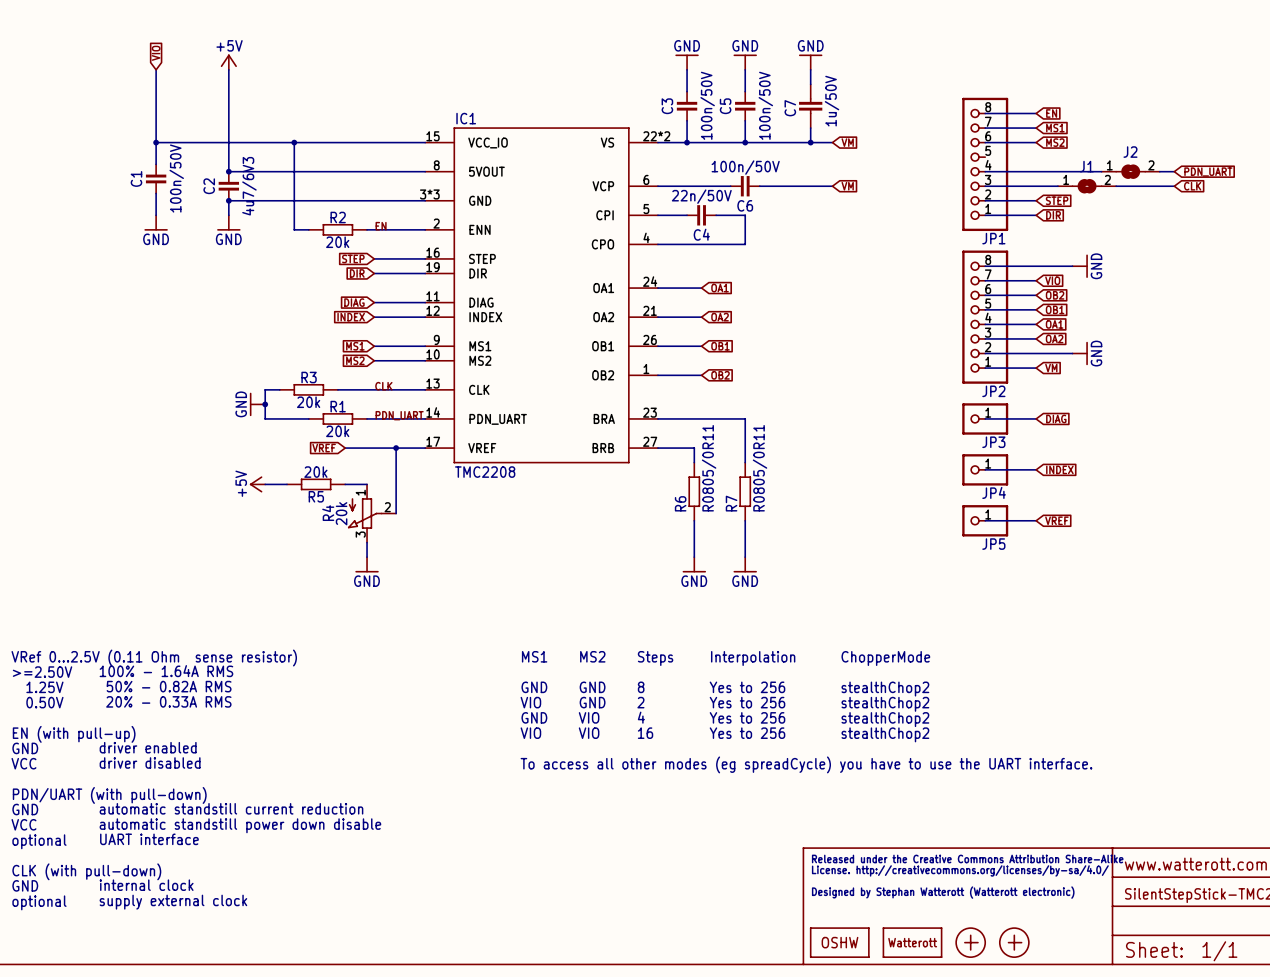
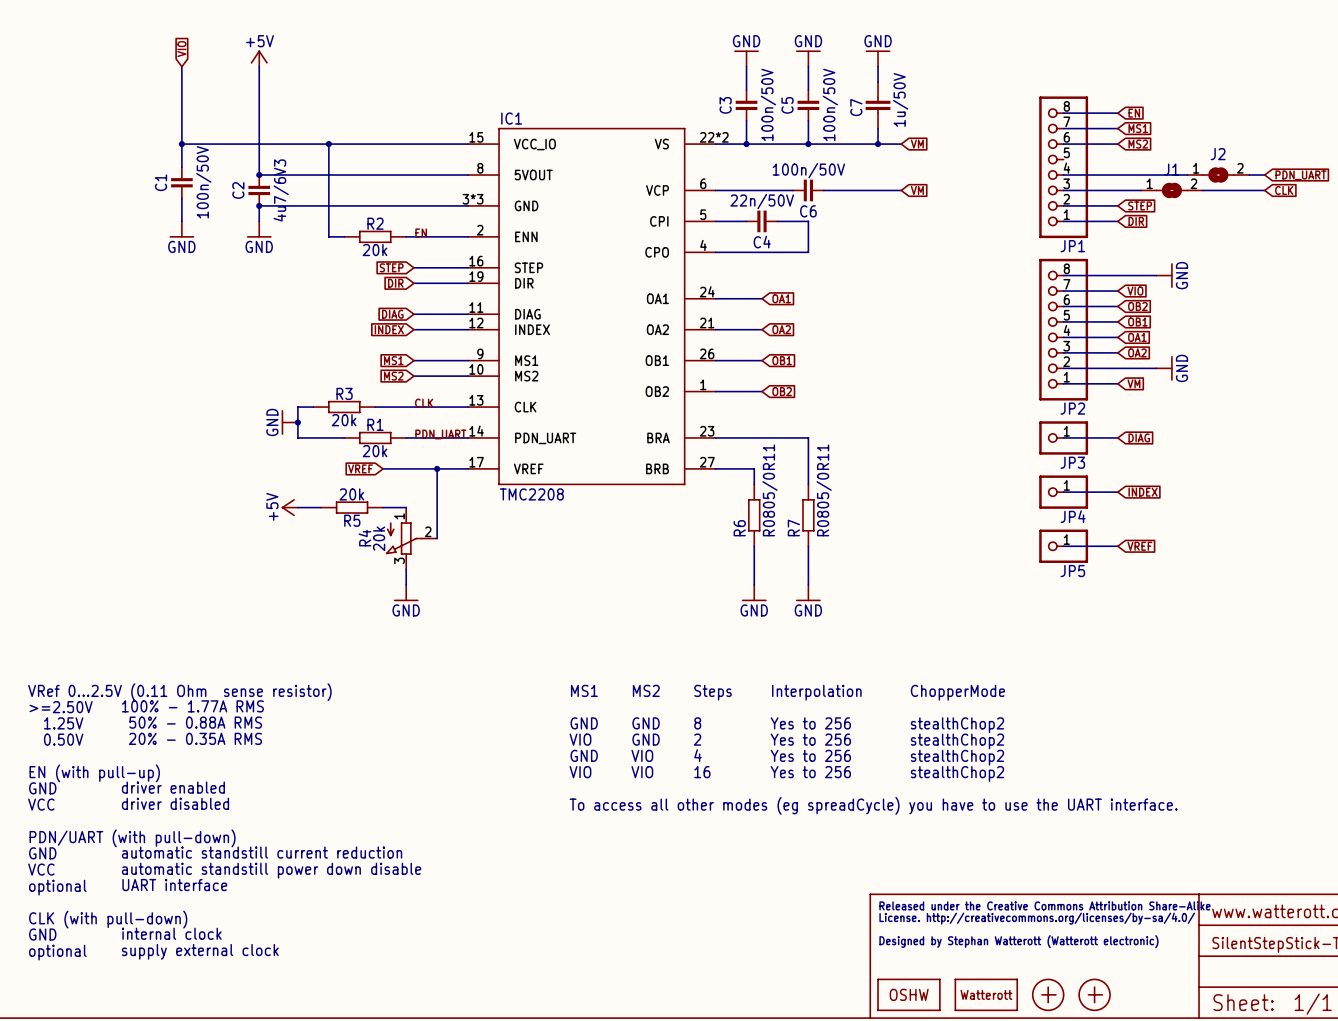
text: 100% - 1.64A RMS (166, 671) -> 100% - 1.77A RMS (192, 706)
text: 50% - 0.82A RMS (169, 686) -> 50% - 0.88A RMS (195, 722)
text: 20% - 0.33A RMS (168, 701) -> 20% - 0.35A RMS (195, 738)

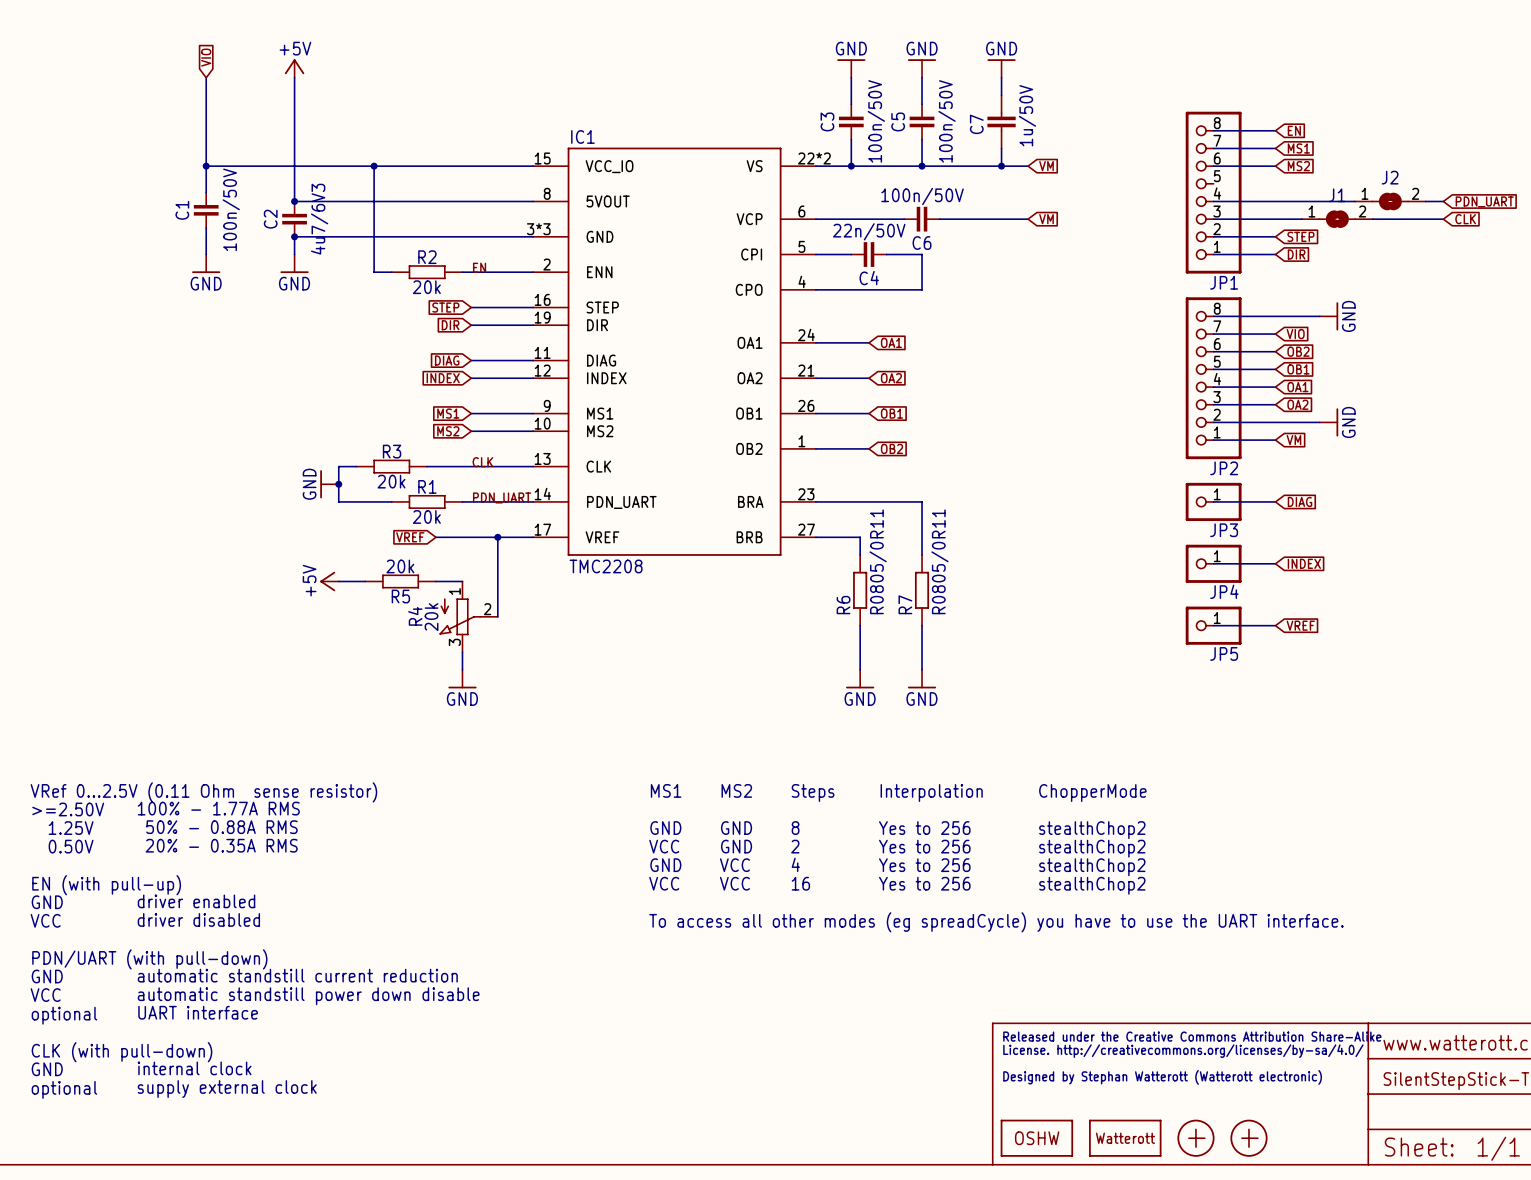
text: VIO (580, 739) -> VCC (664, 846)
text: VIO (642, 755) -> VCC (734, 865)
text: VIO (580, 772) -> VCC (664, 883)
text: VIO (642, 772) -> VCC (734, 883)

